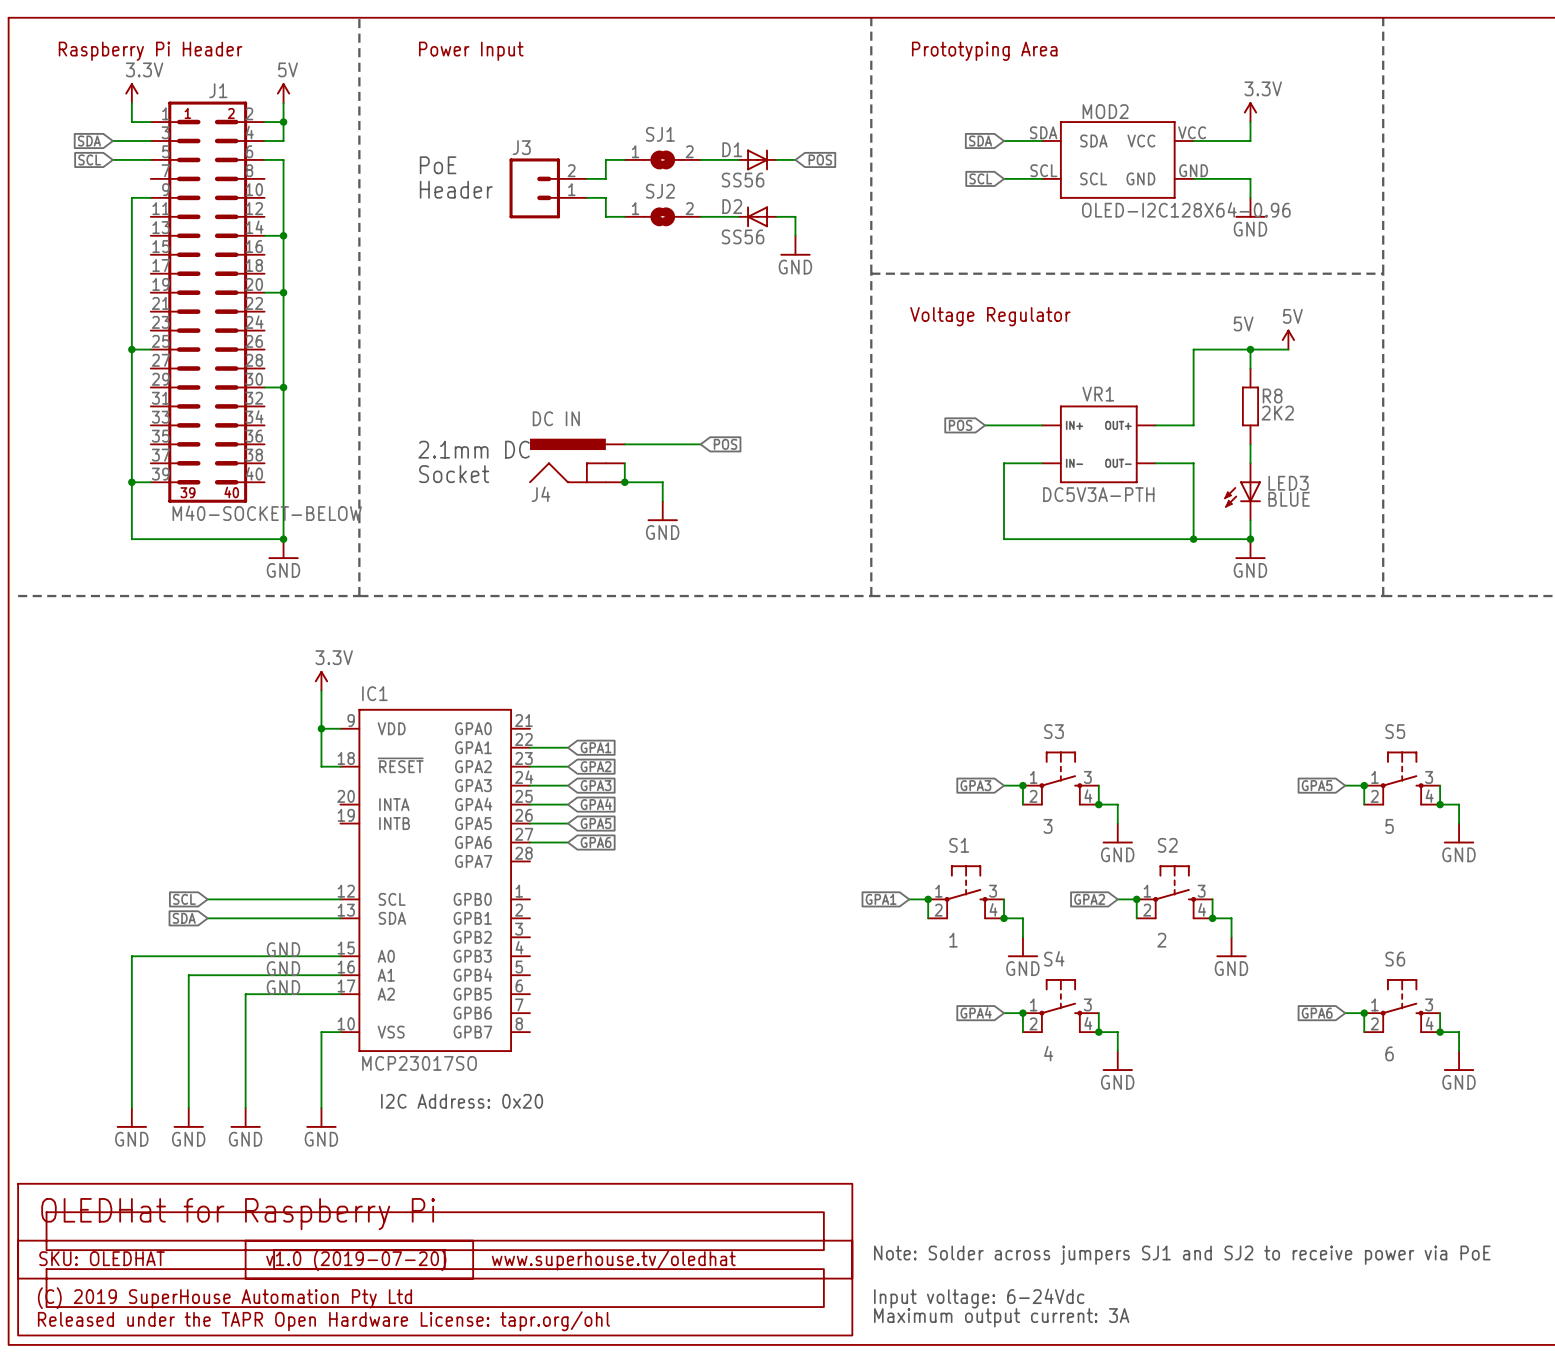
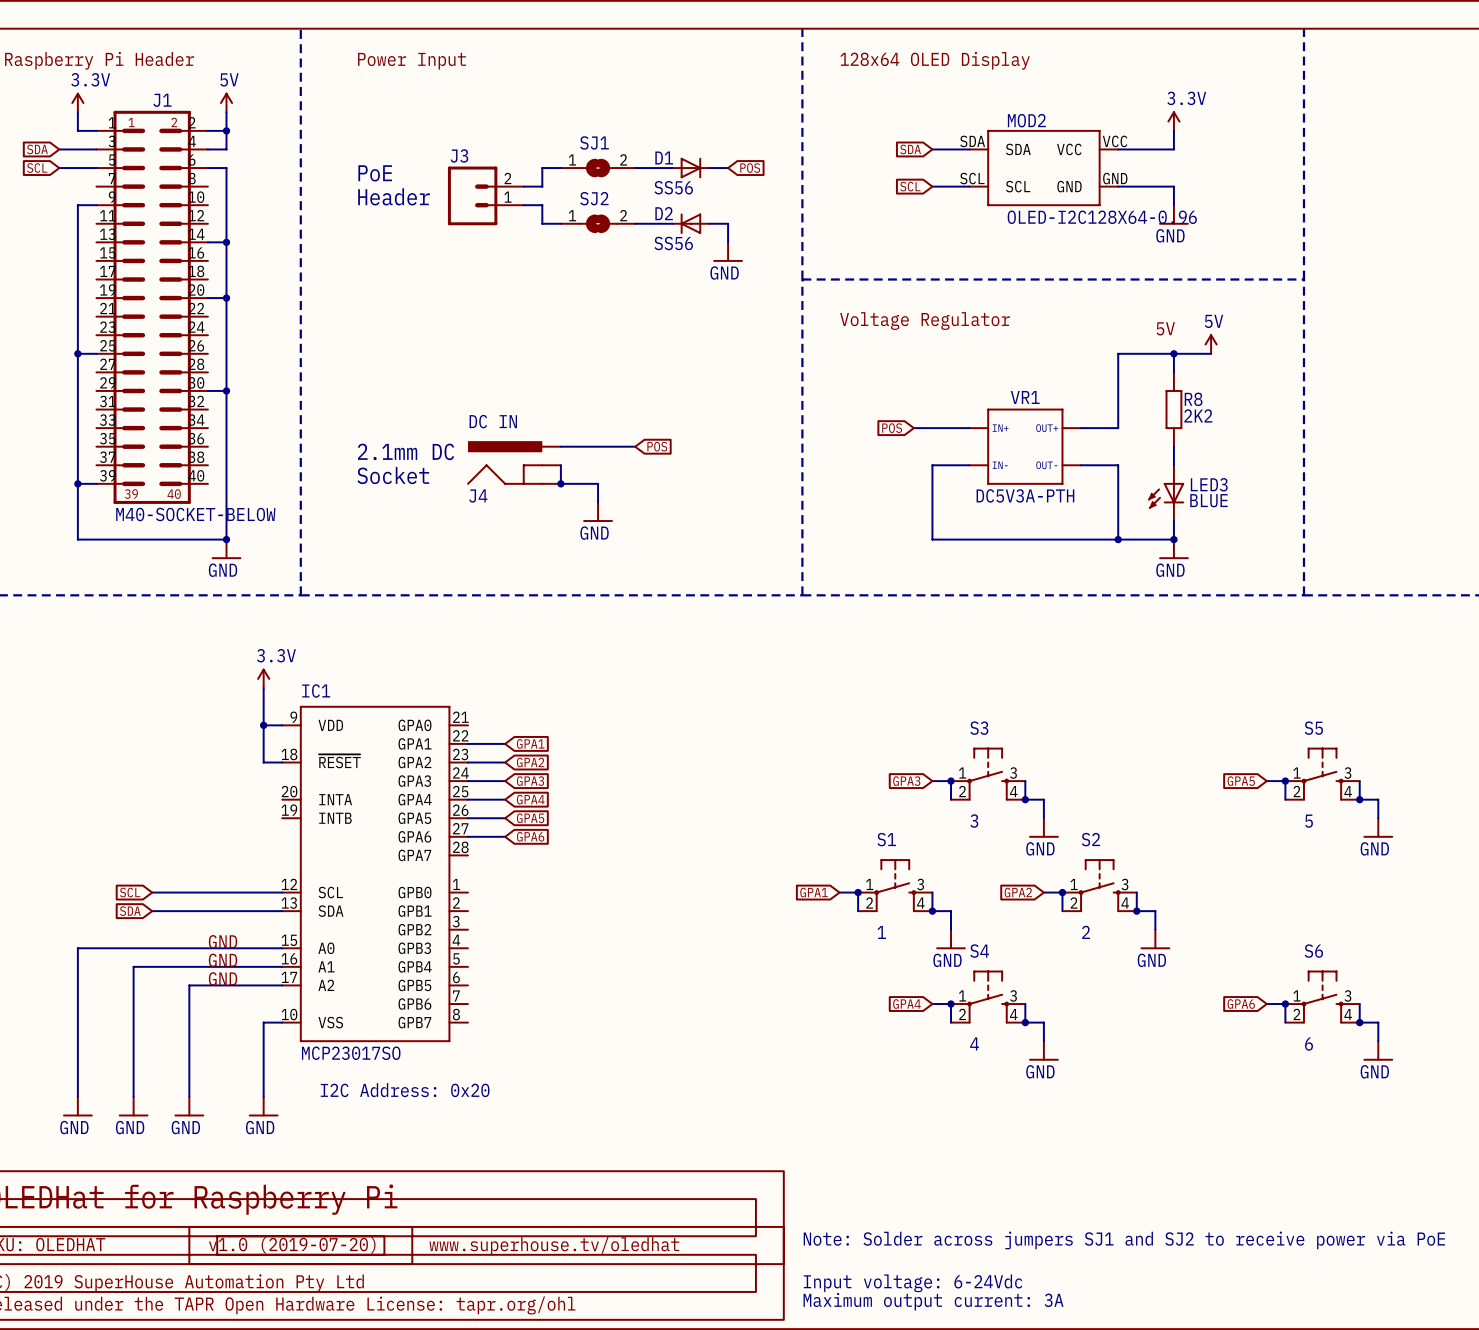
text: Prototyping Area (984, 51) -> 128x64 OLED Display (935, 60)

